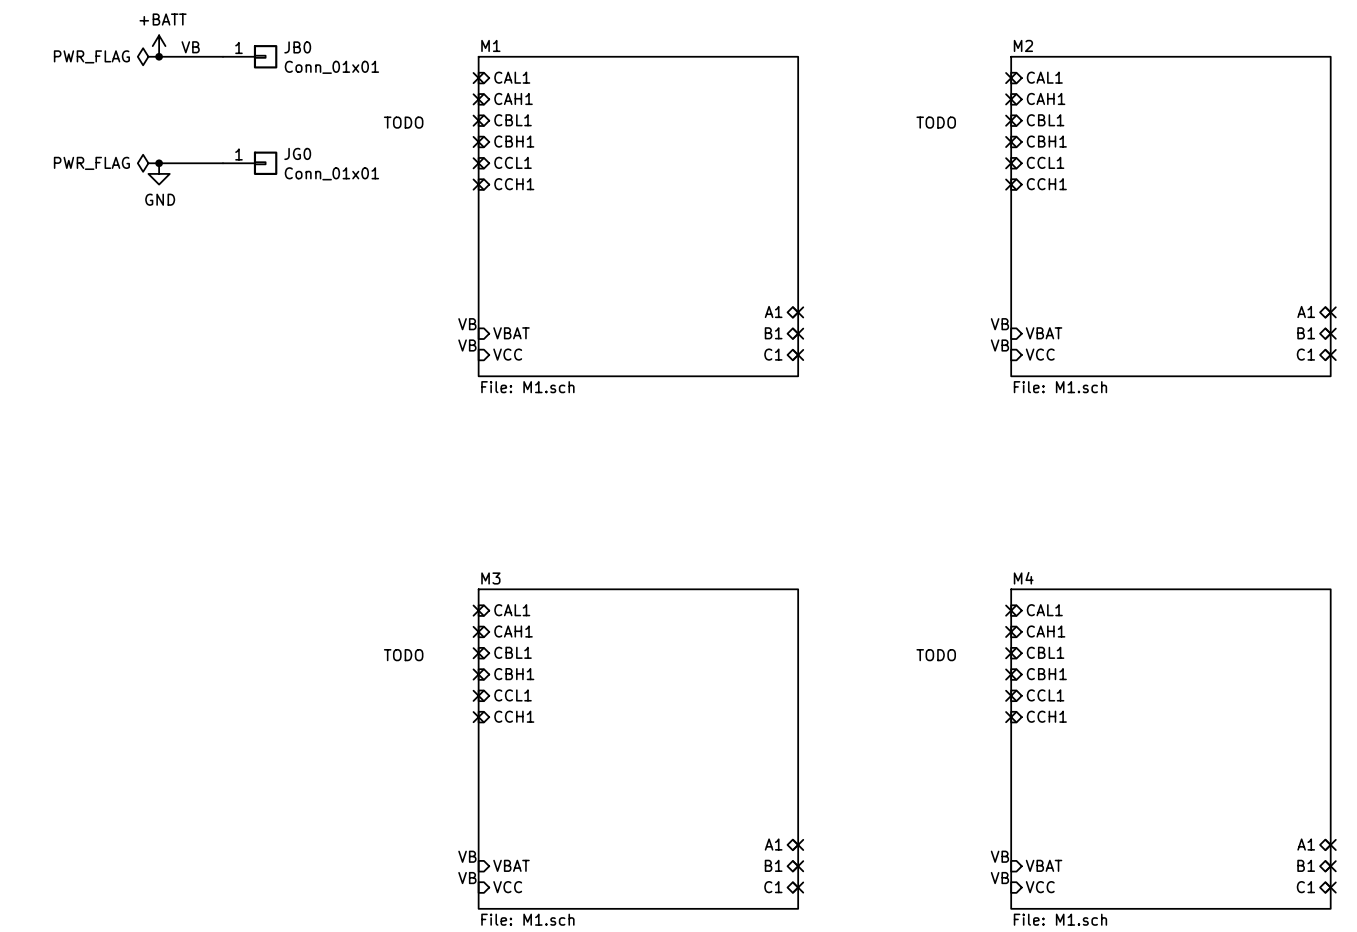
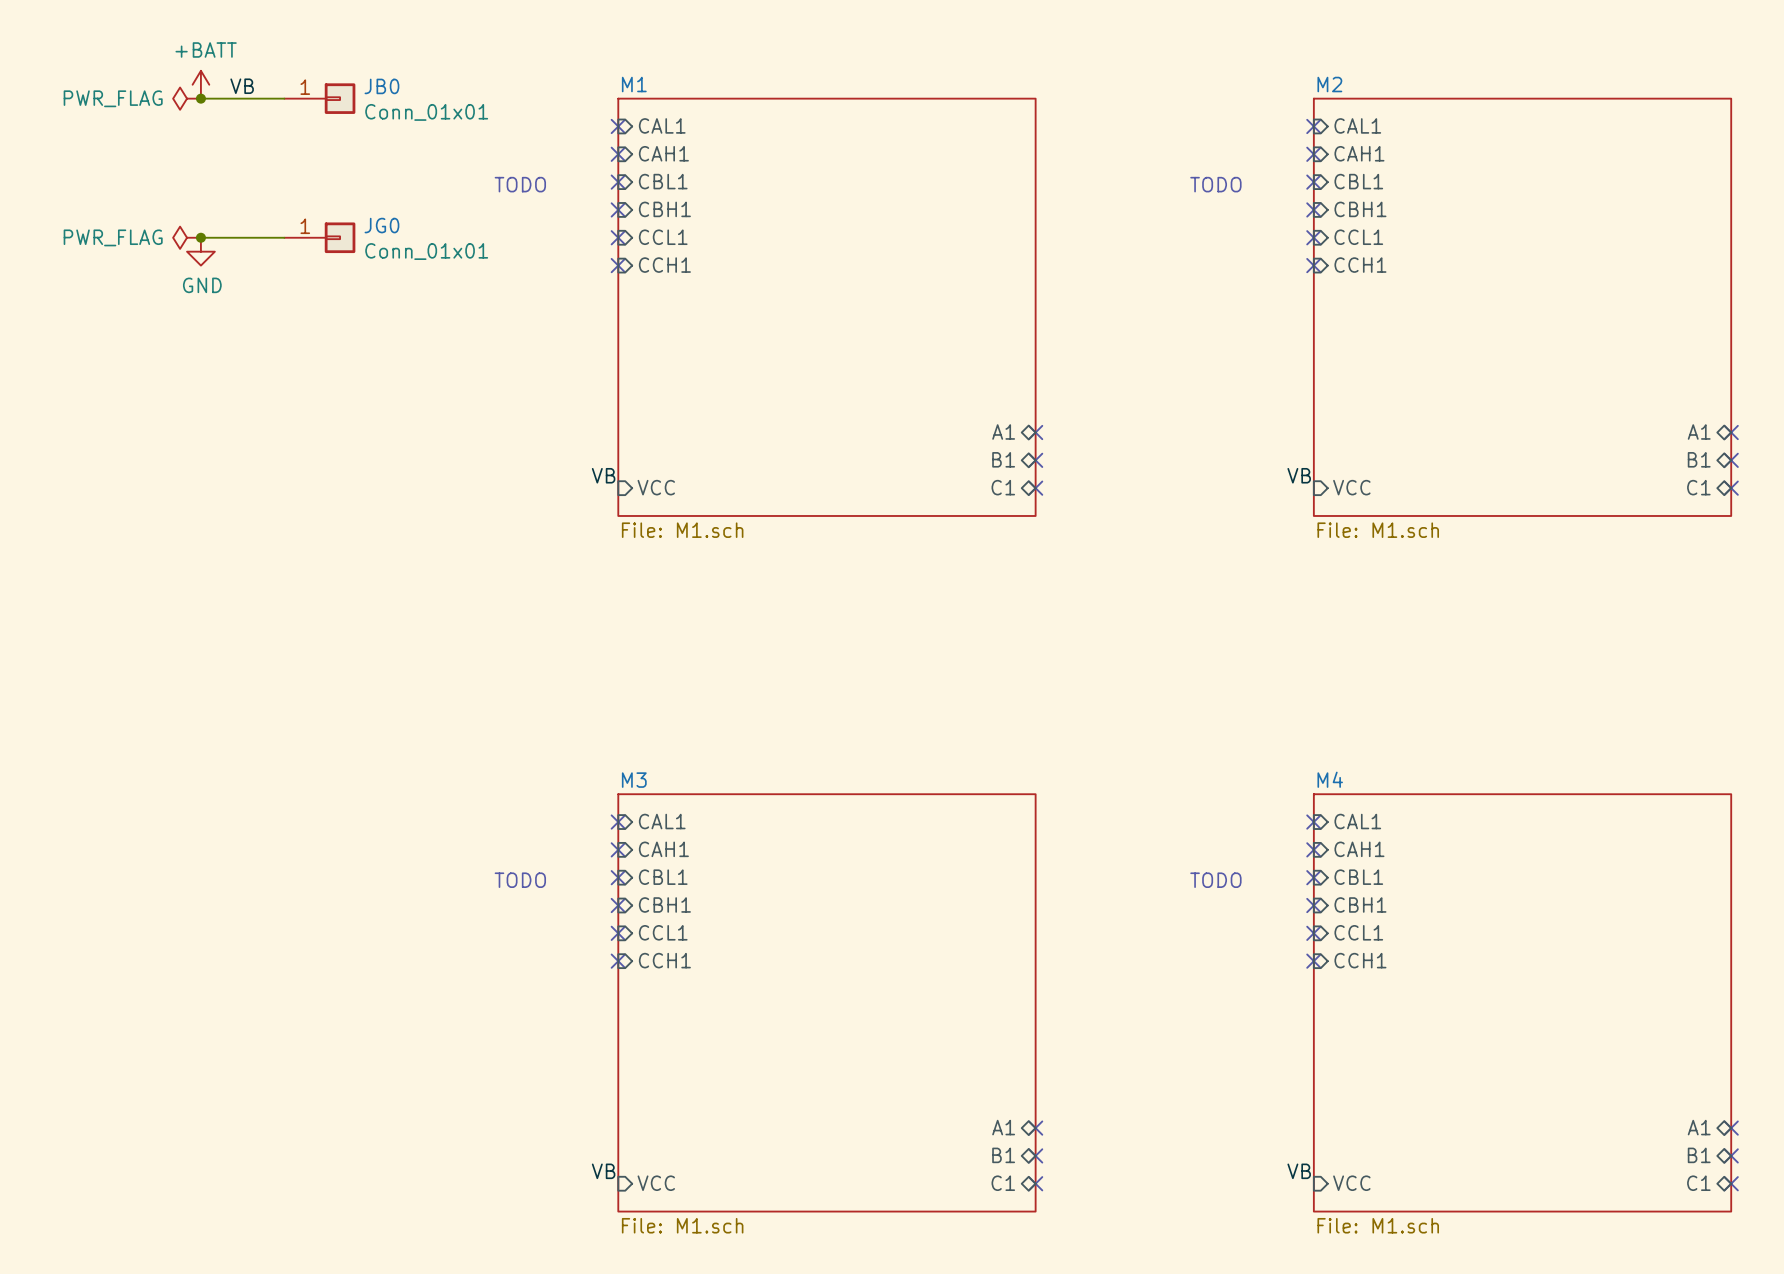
label: VB (467, 324) -> none
label: VB (999, 324) -> none
sheet pin: VBAT (511, 333) -> none
sheet pin: VBAT (1044, 333) -> none
label: VB (467, 856) -> none
label: VB (999, 856) -> none
sheet pin: VBAT (511, 865) -> none
sheet pin: VBAT (1044, 865) -> none

